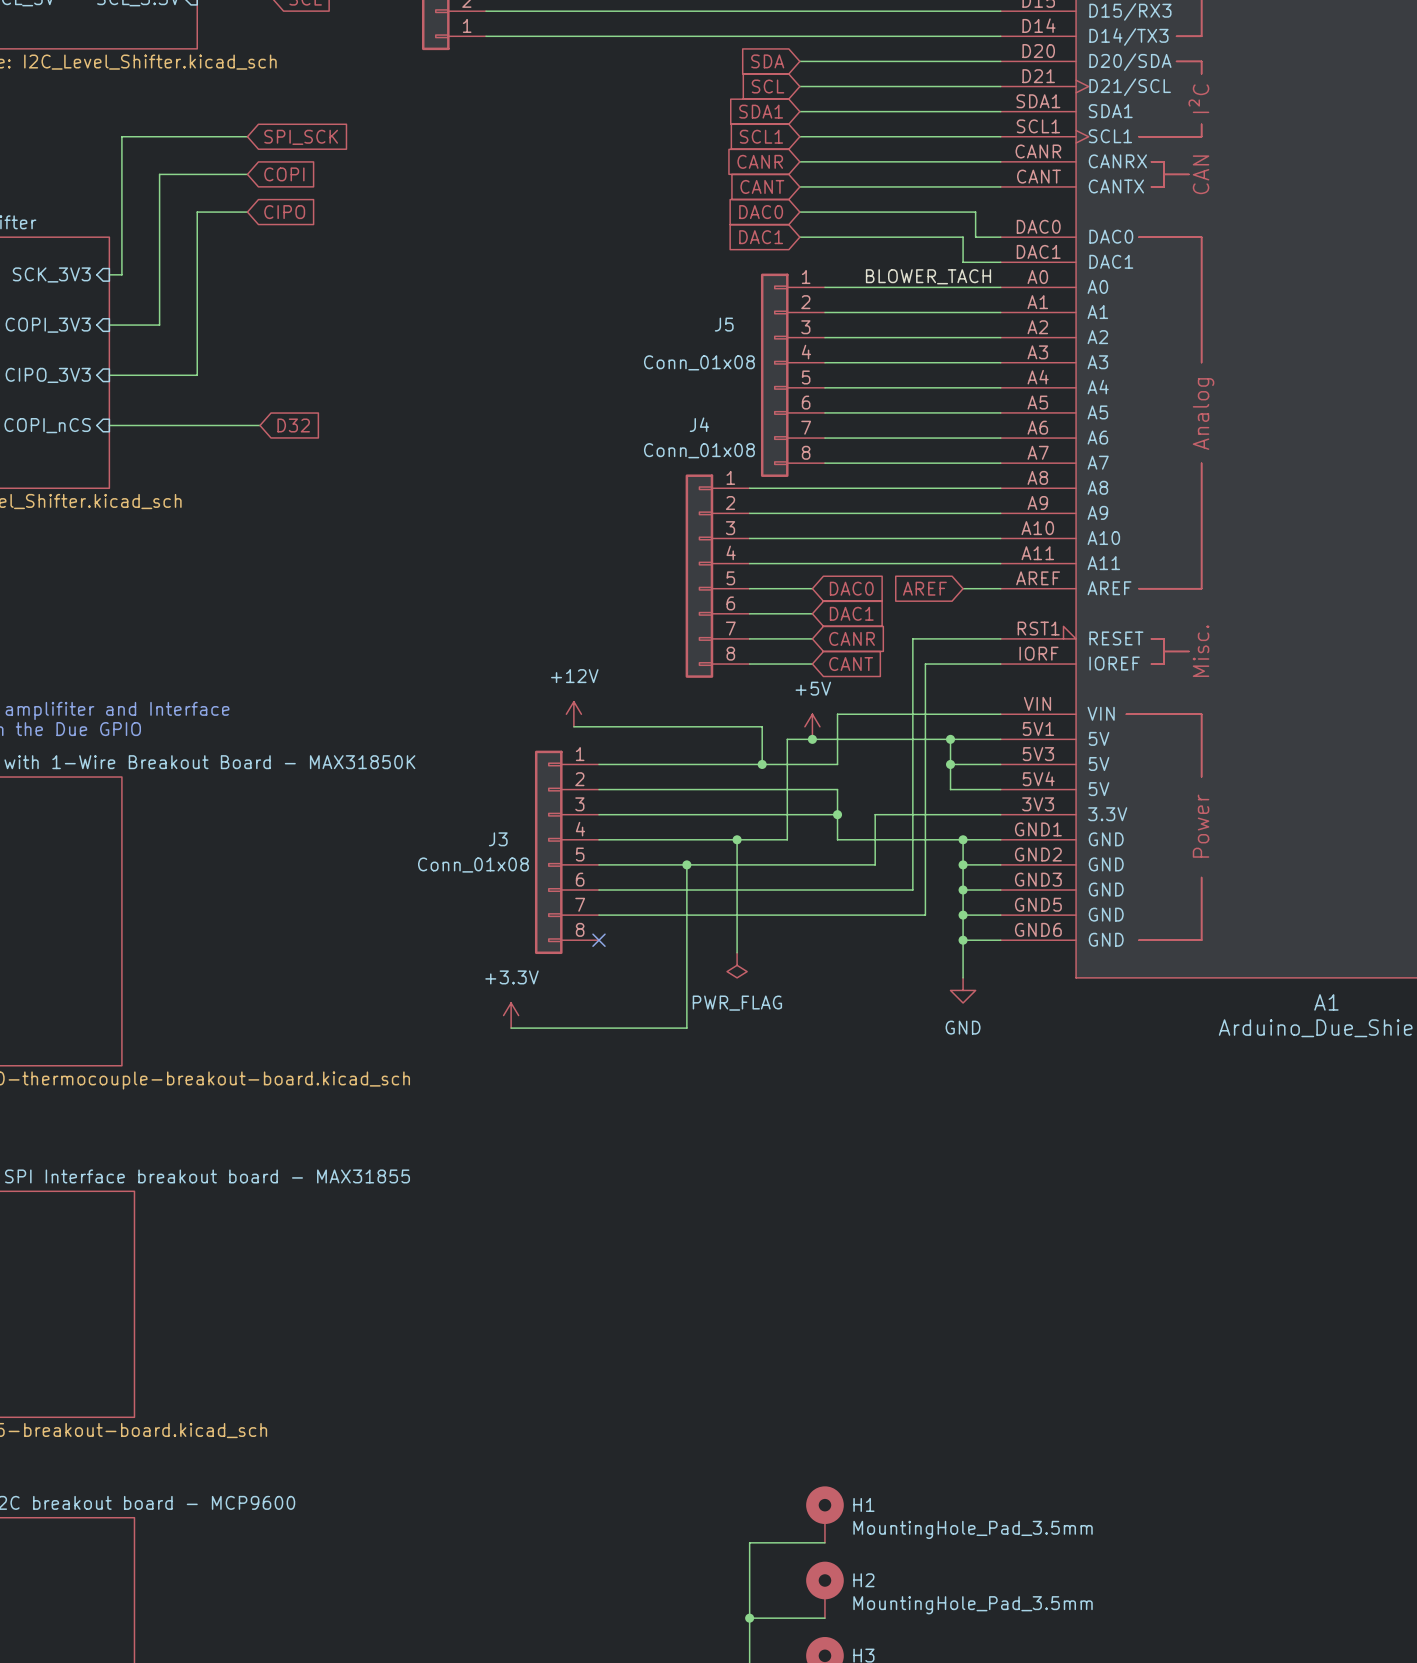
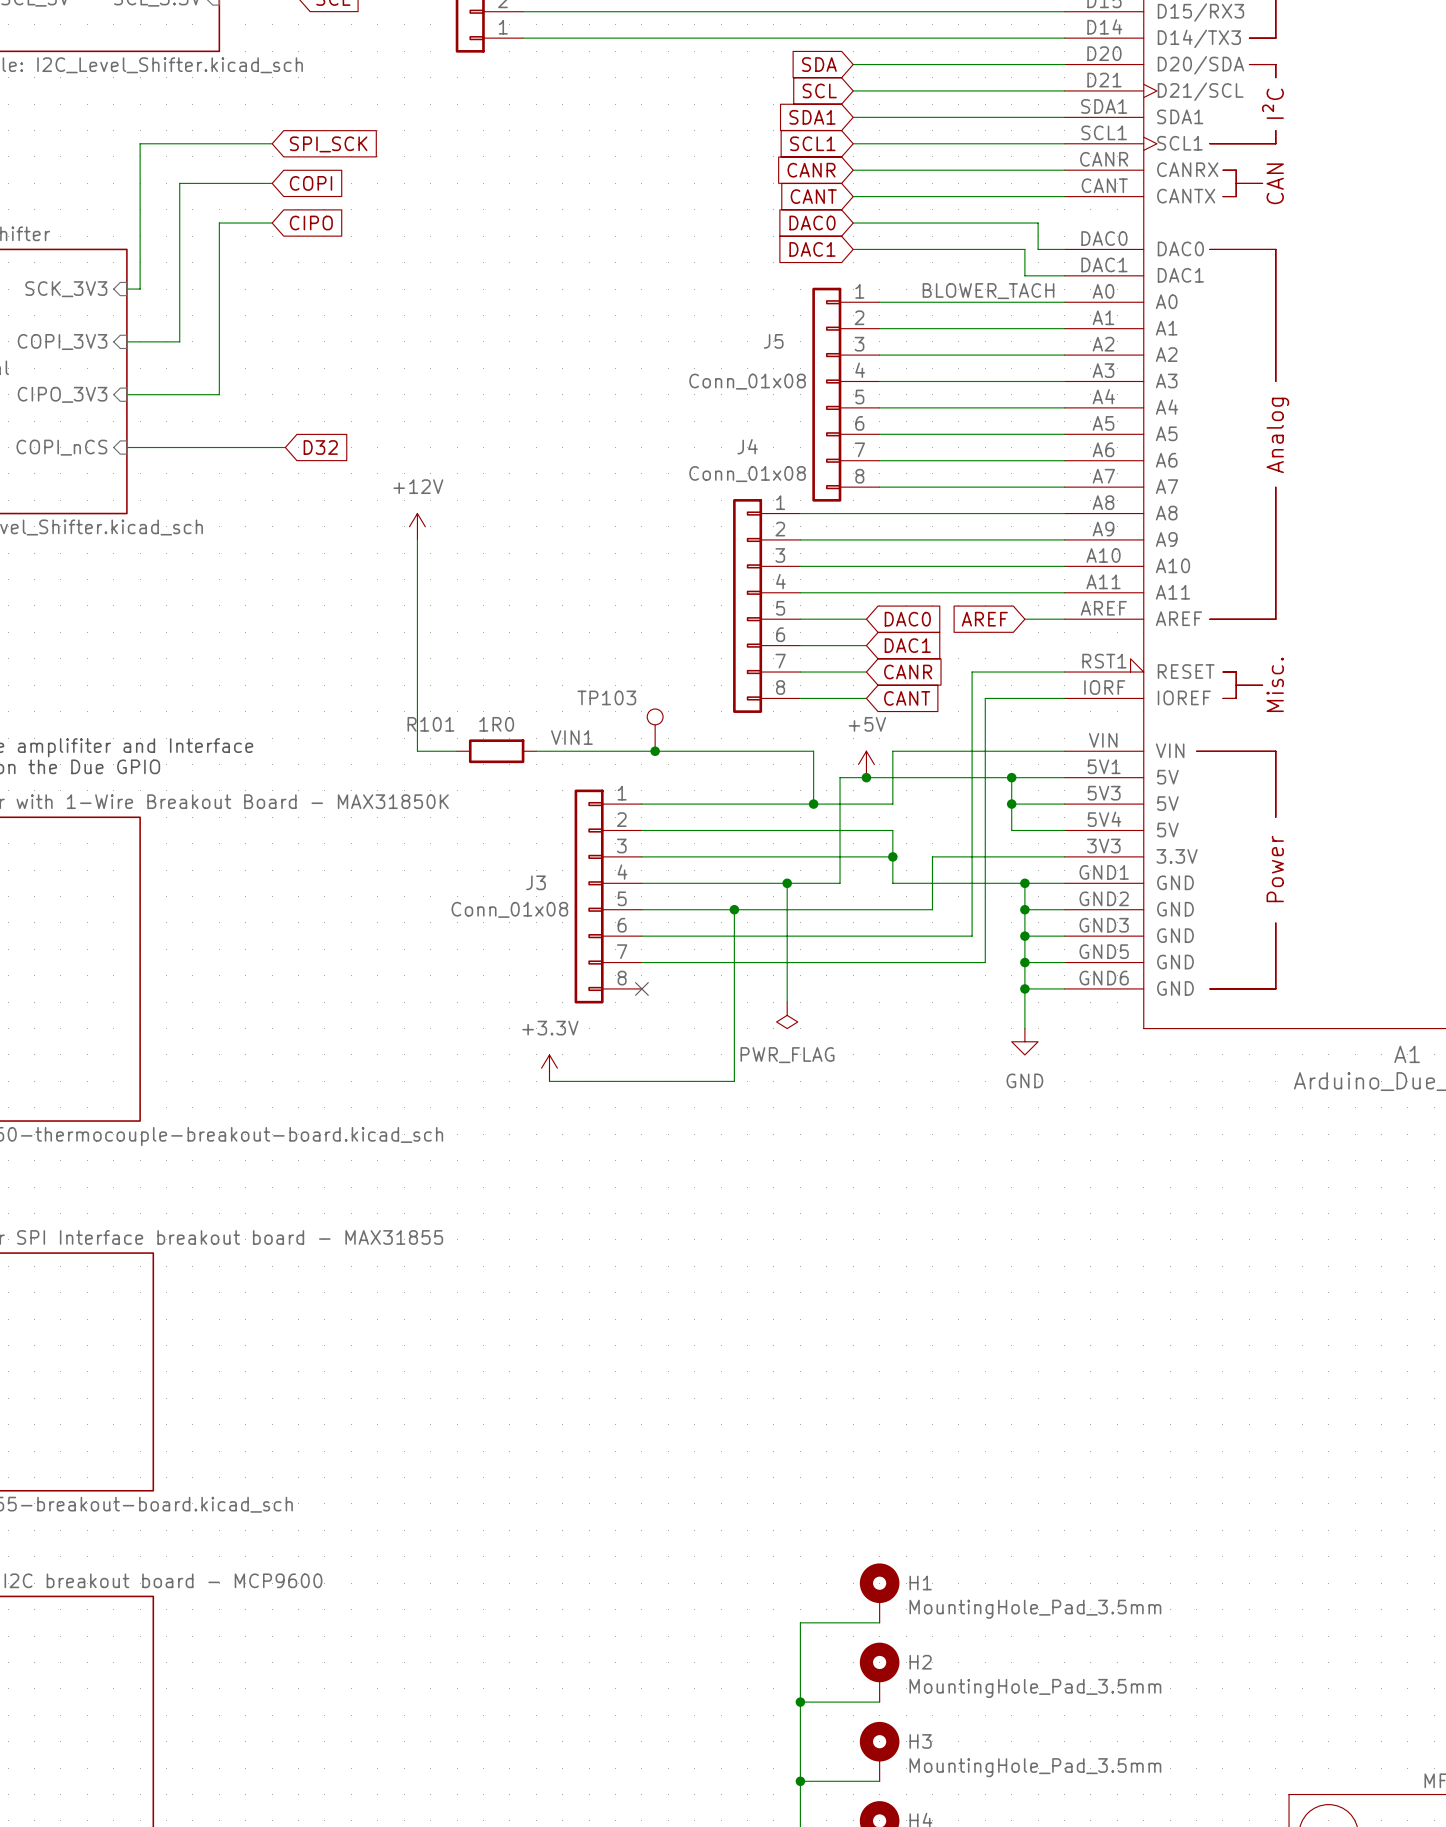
power symbol: none -> +12V (417, 526)
wire: none -> (417, 539) (417, 751) (457, 751)
TP103: none -> VIN1 (655, 730)
R101: none -> 1R0 (496, 751)
power symbol: +12V (573, 714) -> none
junction: none -> (655, 751)
wire: (573, 726) (762, 726) -> (536, 751) (813, 751) (813, 764)

